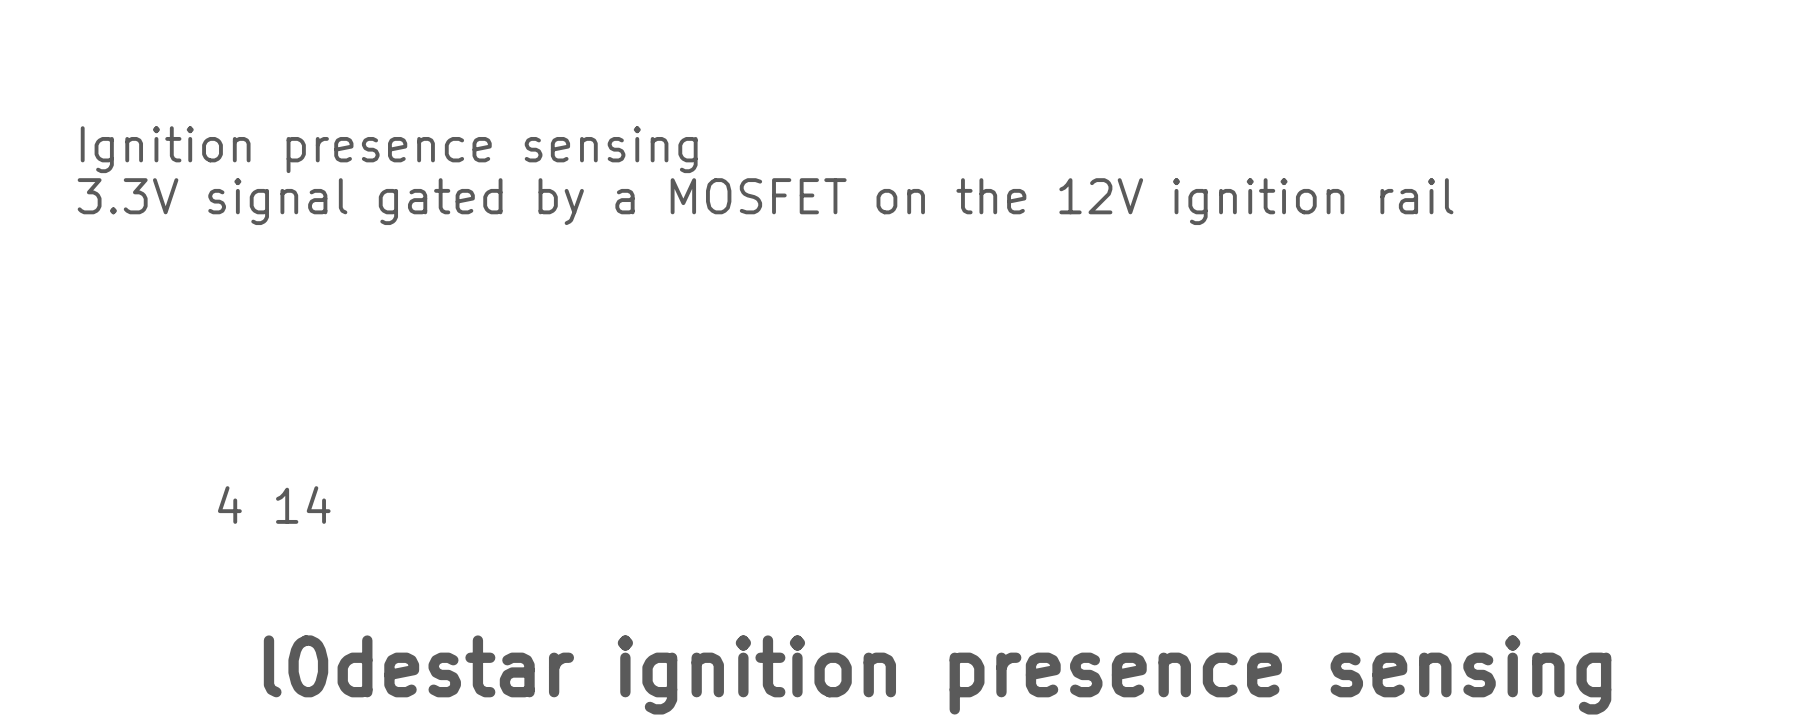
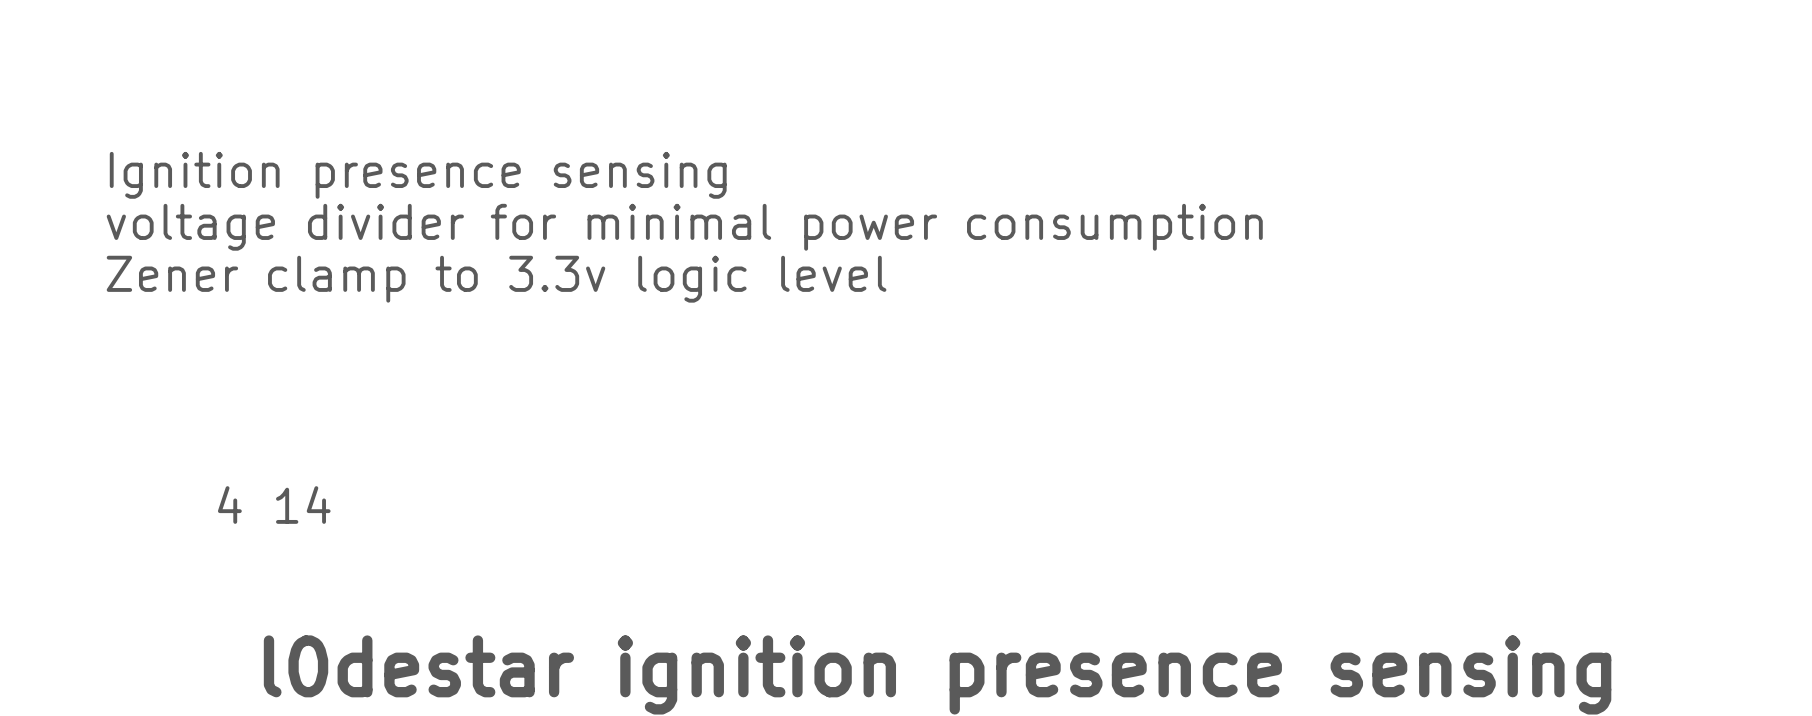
text position: Ignition presence sensing (389, 149) -> Ignition presence sensing (418, 175)
text: 3.3V signal gated by a MOSFET on the 12V ignition rail (765, 201) -> none
text: none -> voltage divider for minimal power consumption (684, 227)
text: none -> Zener clamp to 3.3v logic level (496, 279)

